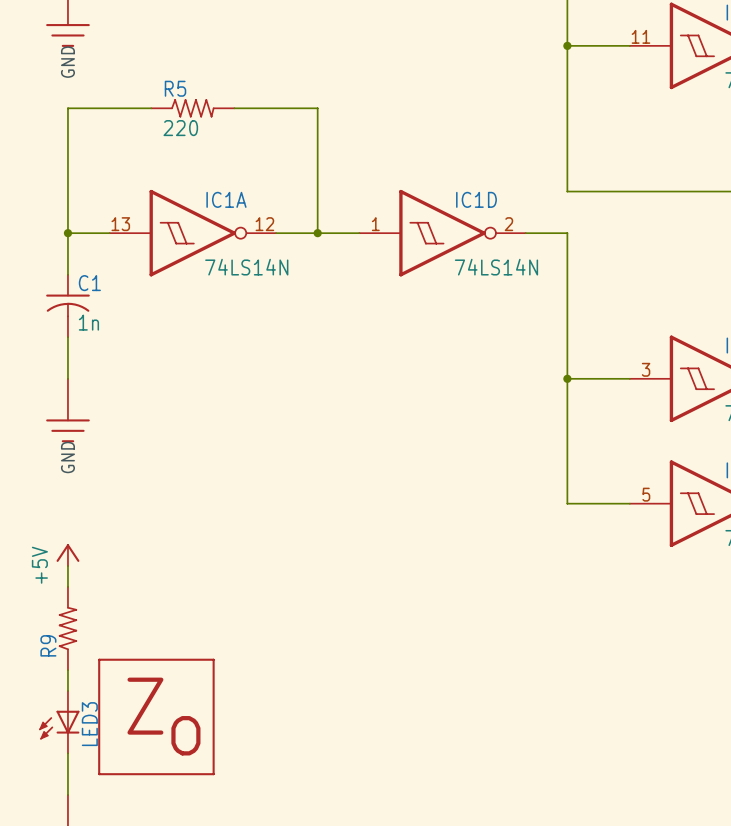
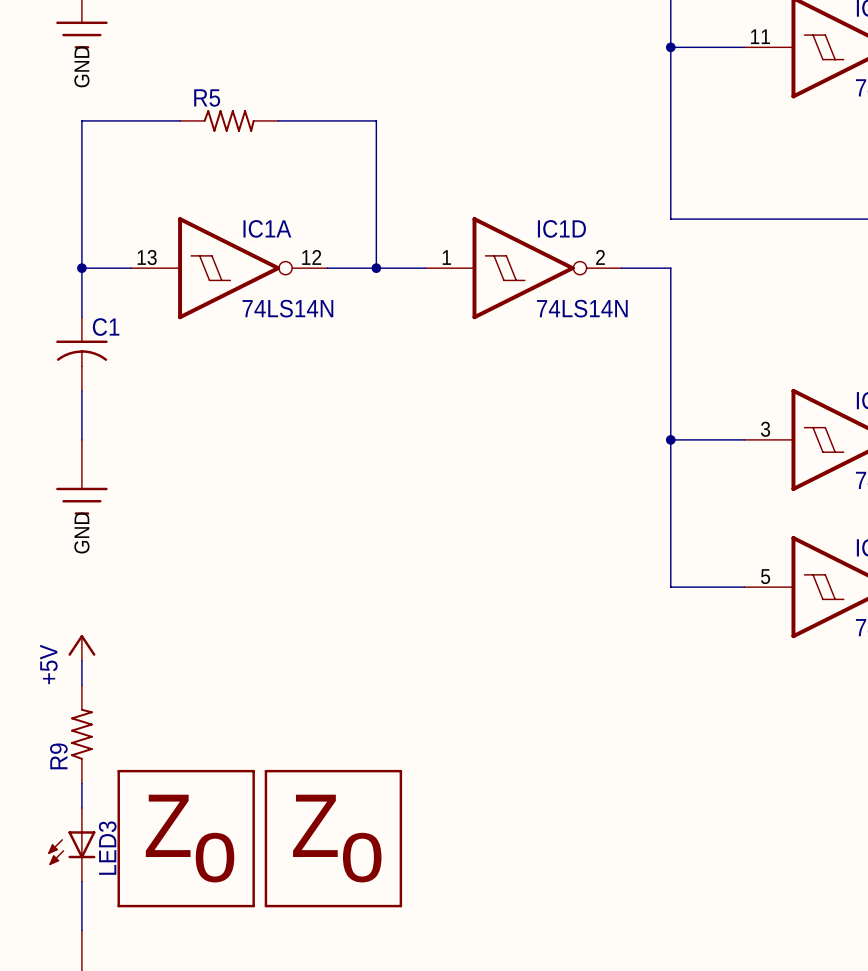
R5 value: 220 (180, 128) -> none
C1 value: 1n (88, 322) -> none
part: none -> (333, 838)

